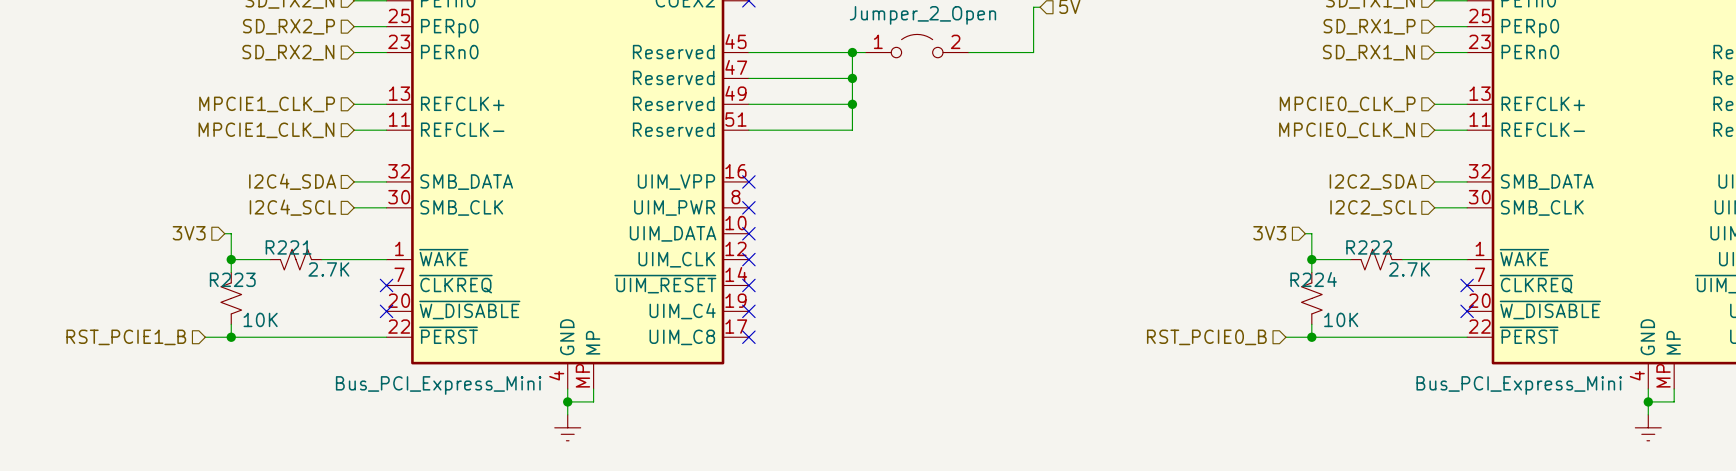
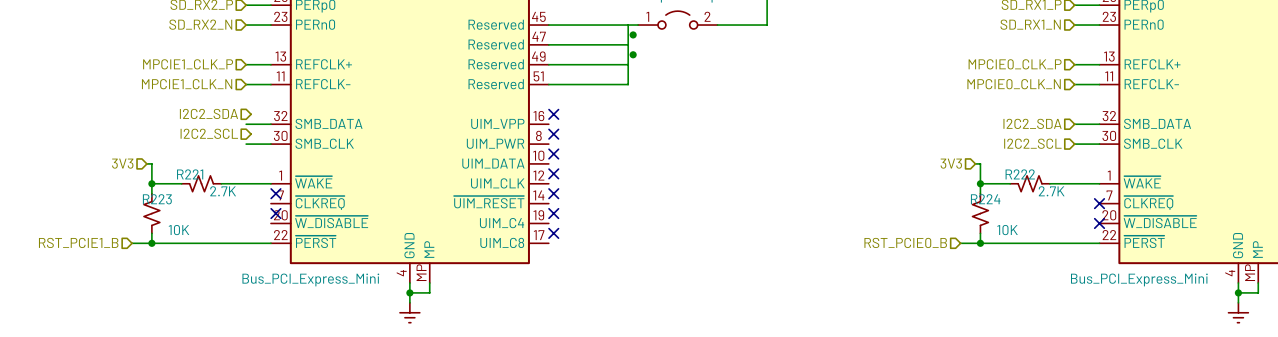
junction: (852, 52) -> none
junction: none -> (633, 34)
junction: (852, 78) -> none
junction: none -> (633, 54)
junction: (852, 104) -> none
hierarchical label: none -> I2C2_SDA (208, 113)
no-connect mark: none -> (553, 114)
hierarchical label: I2C4_SDA (292, 181) -> none
no-connect mark: (748, 181) -> none
no-connect mark: none -> (553, 134)
hierarchical label: none -> I2C2_SCL (209, 133)
hierarchical label: I2C4_SCL (292, 207) -> none
no-connect mark: (748, 207) -> none
no-connect mark: none -> (553, 154)
no-connect mark: (748, 233) -> none
no-connect mark: none -> (553, 173)
no-connect mark: (748, 259) -> none
no-connect mark: none -> (275, 193)
no-connect mark: none -> (553, 193)
no-connect mark: (386, 285) -> none
no-connect mark: (748, 285) -> none
no-connect mark: none -> (275, 213)
no-connect mark: none -> (553, 213)
no-connect mark: (386, 311) -> none
no-connect mark: (748, 311) -> none
no-connect mark: none -> (553, 233)
no-connect mark: (748, 337) -> none

